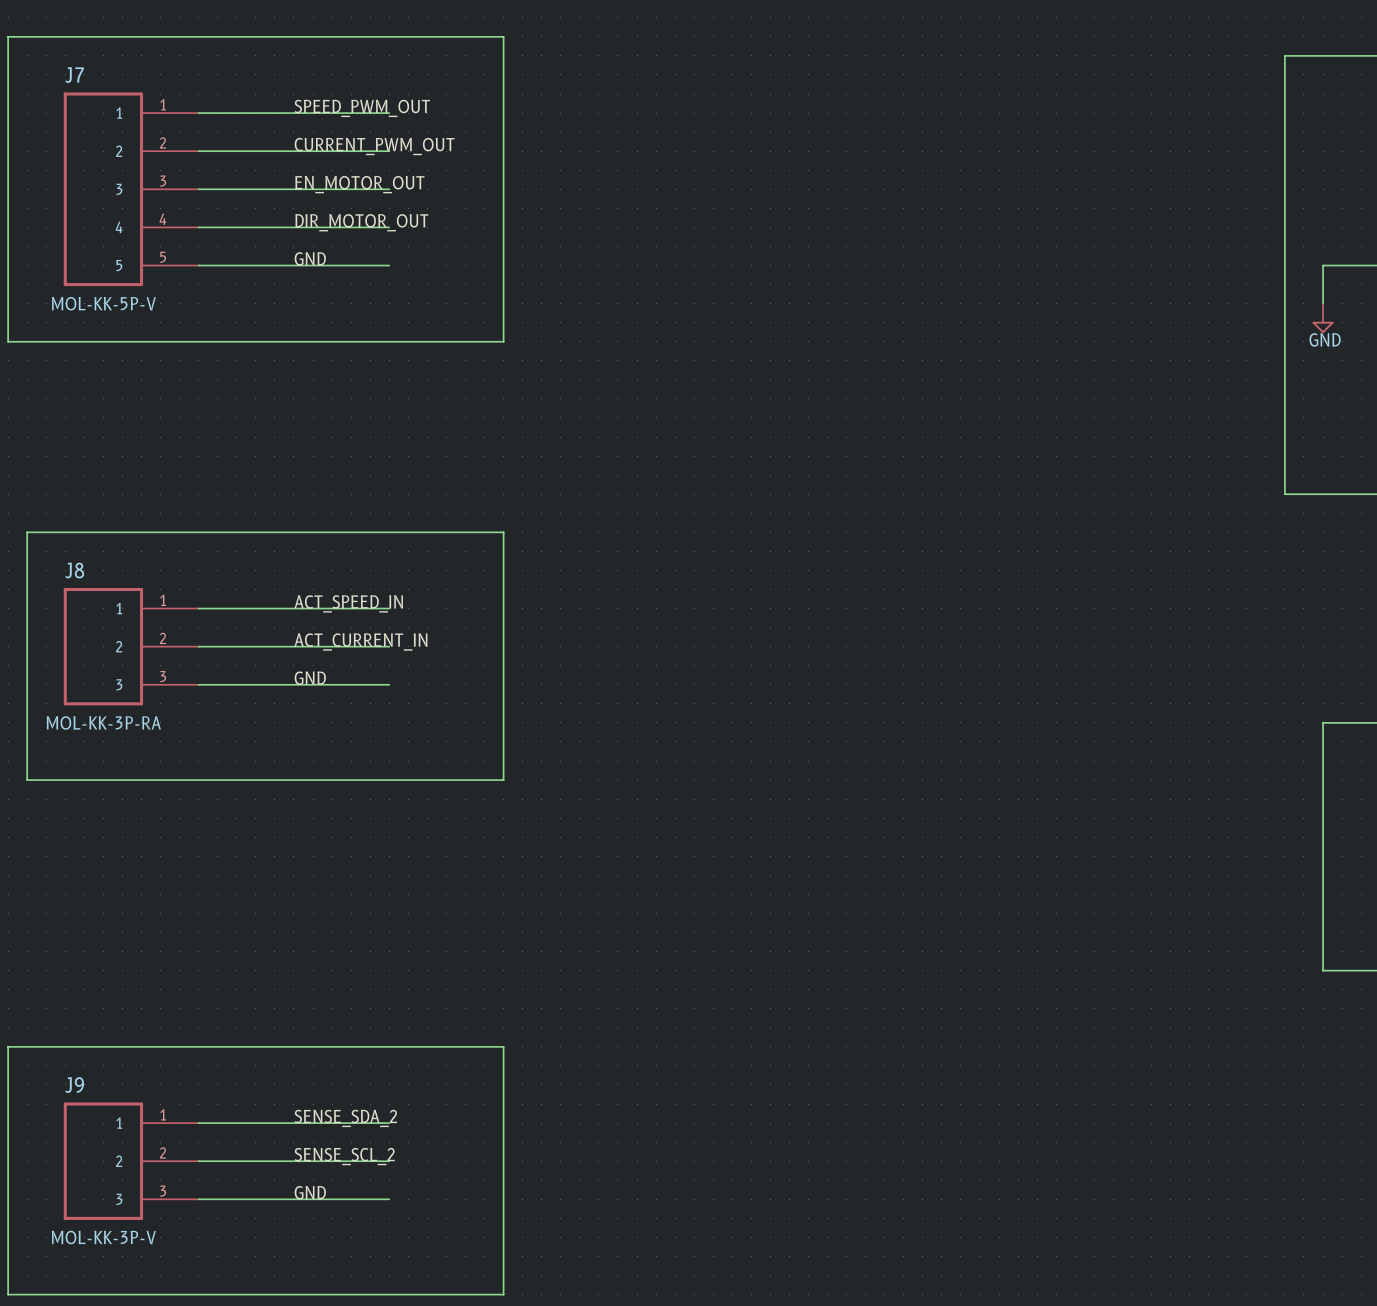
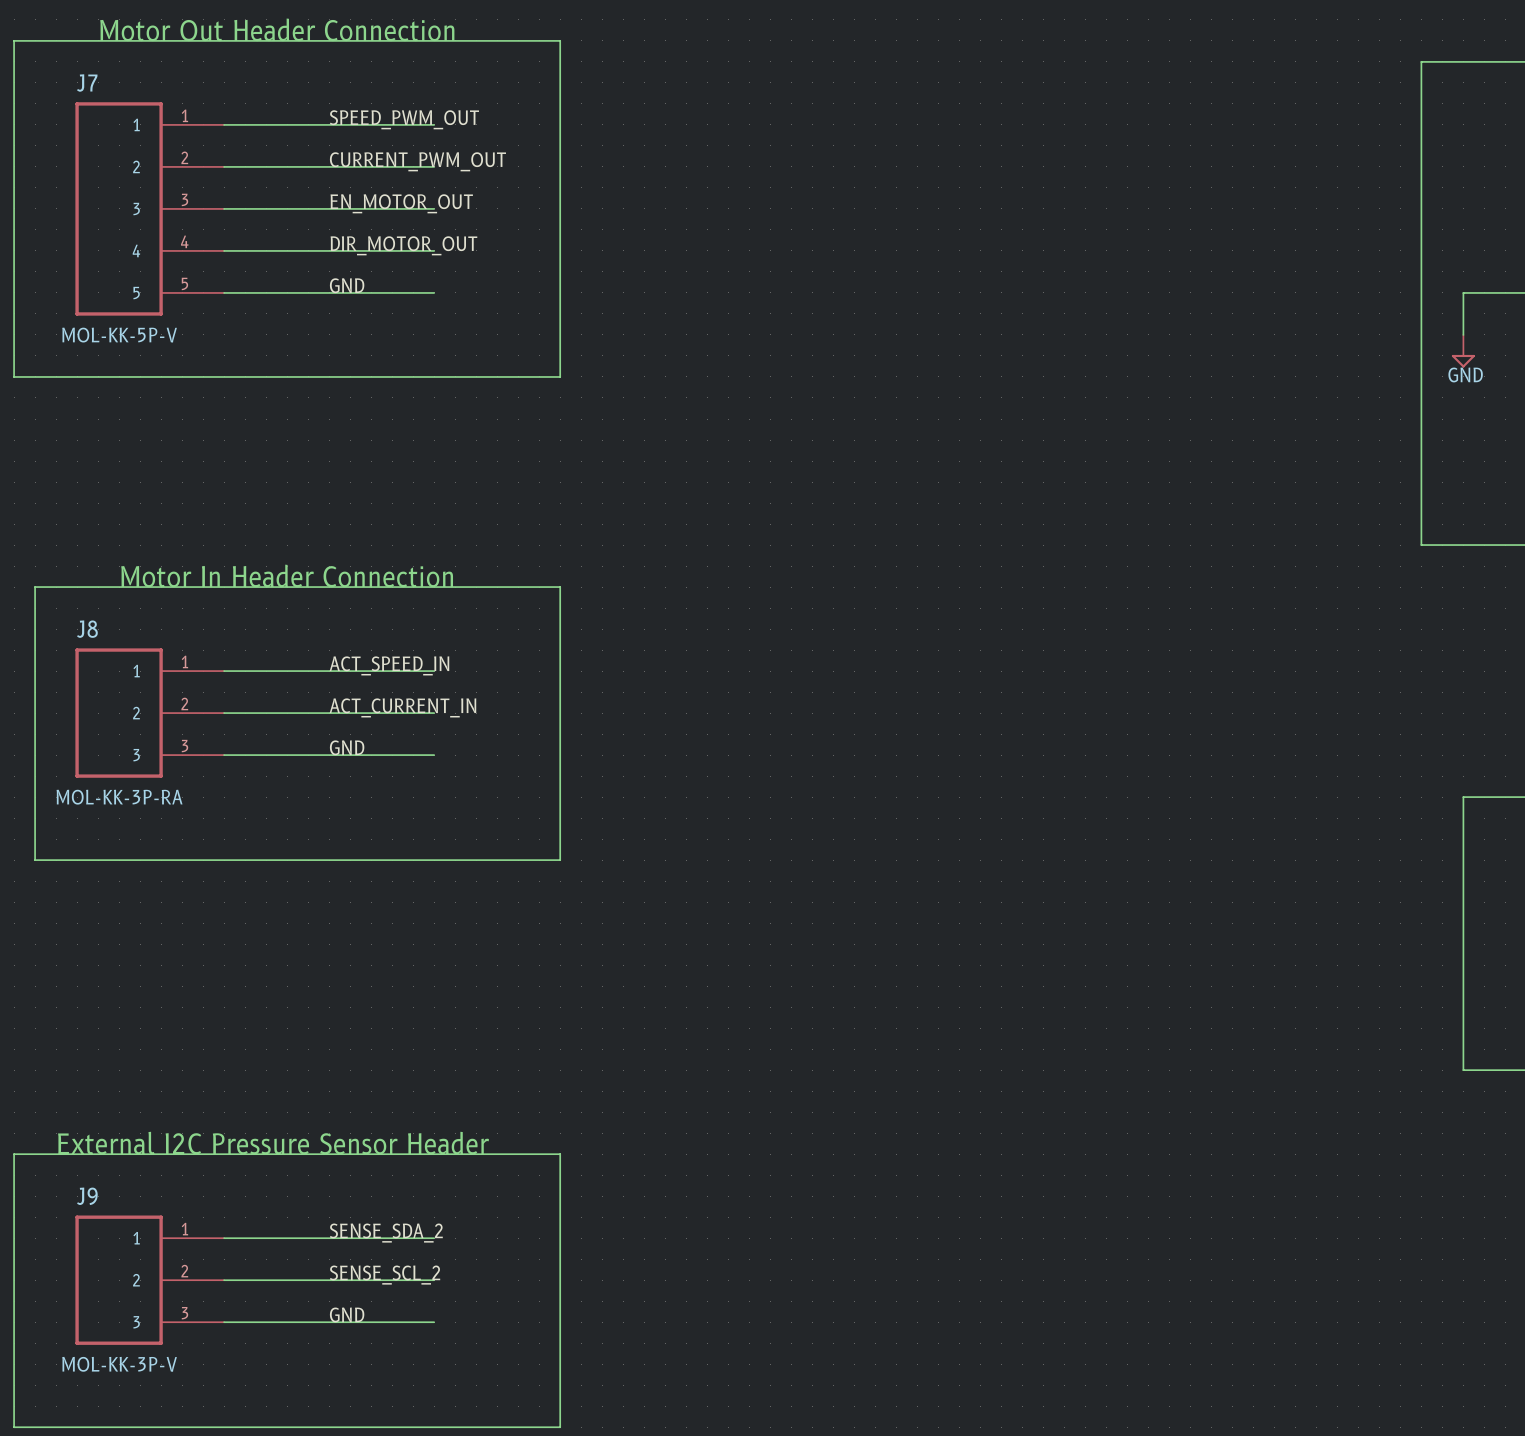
text: none -> Motor Out Header Connection (277, 29)
text: none -> Motor In Header Connection (287, 575)
text: none -> External I2C Pressure Sensor Header (273, 1143)

